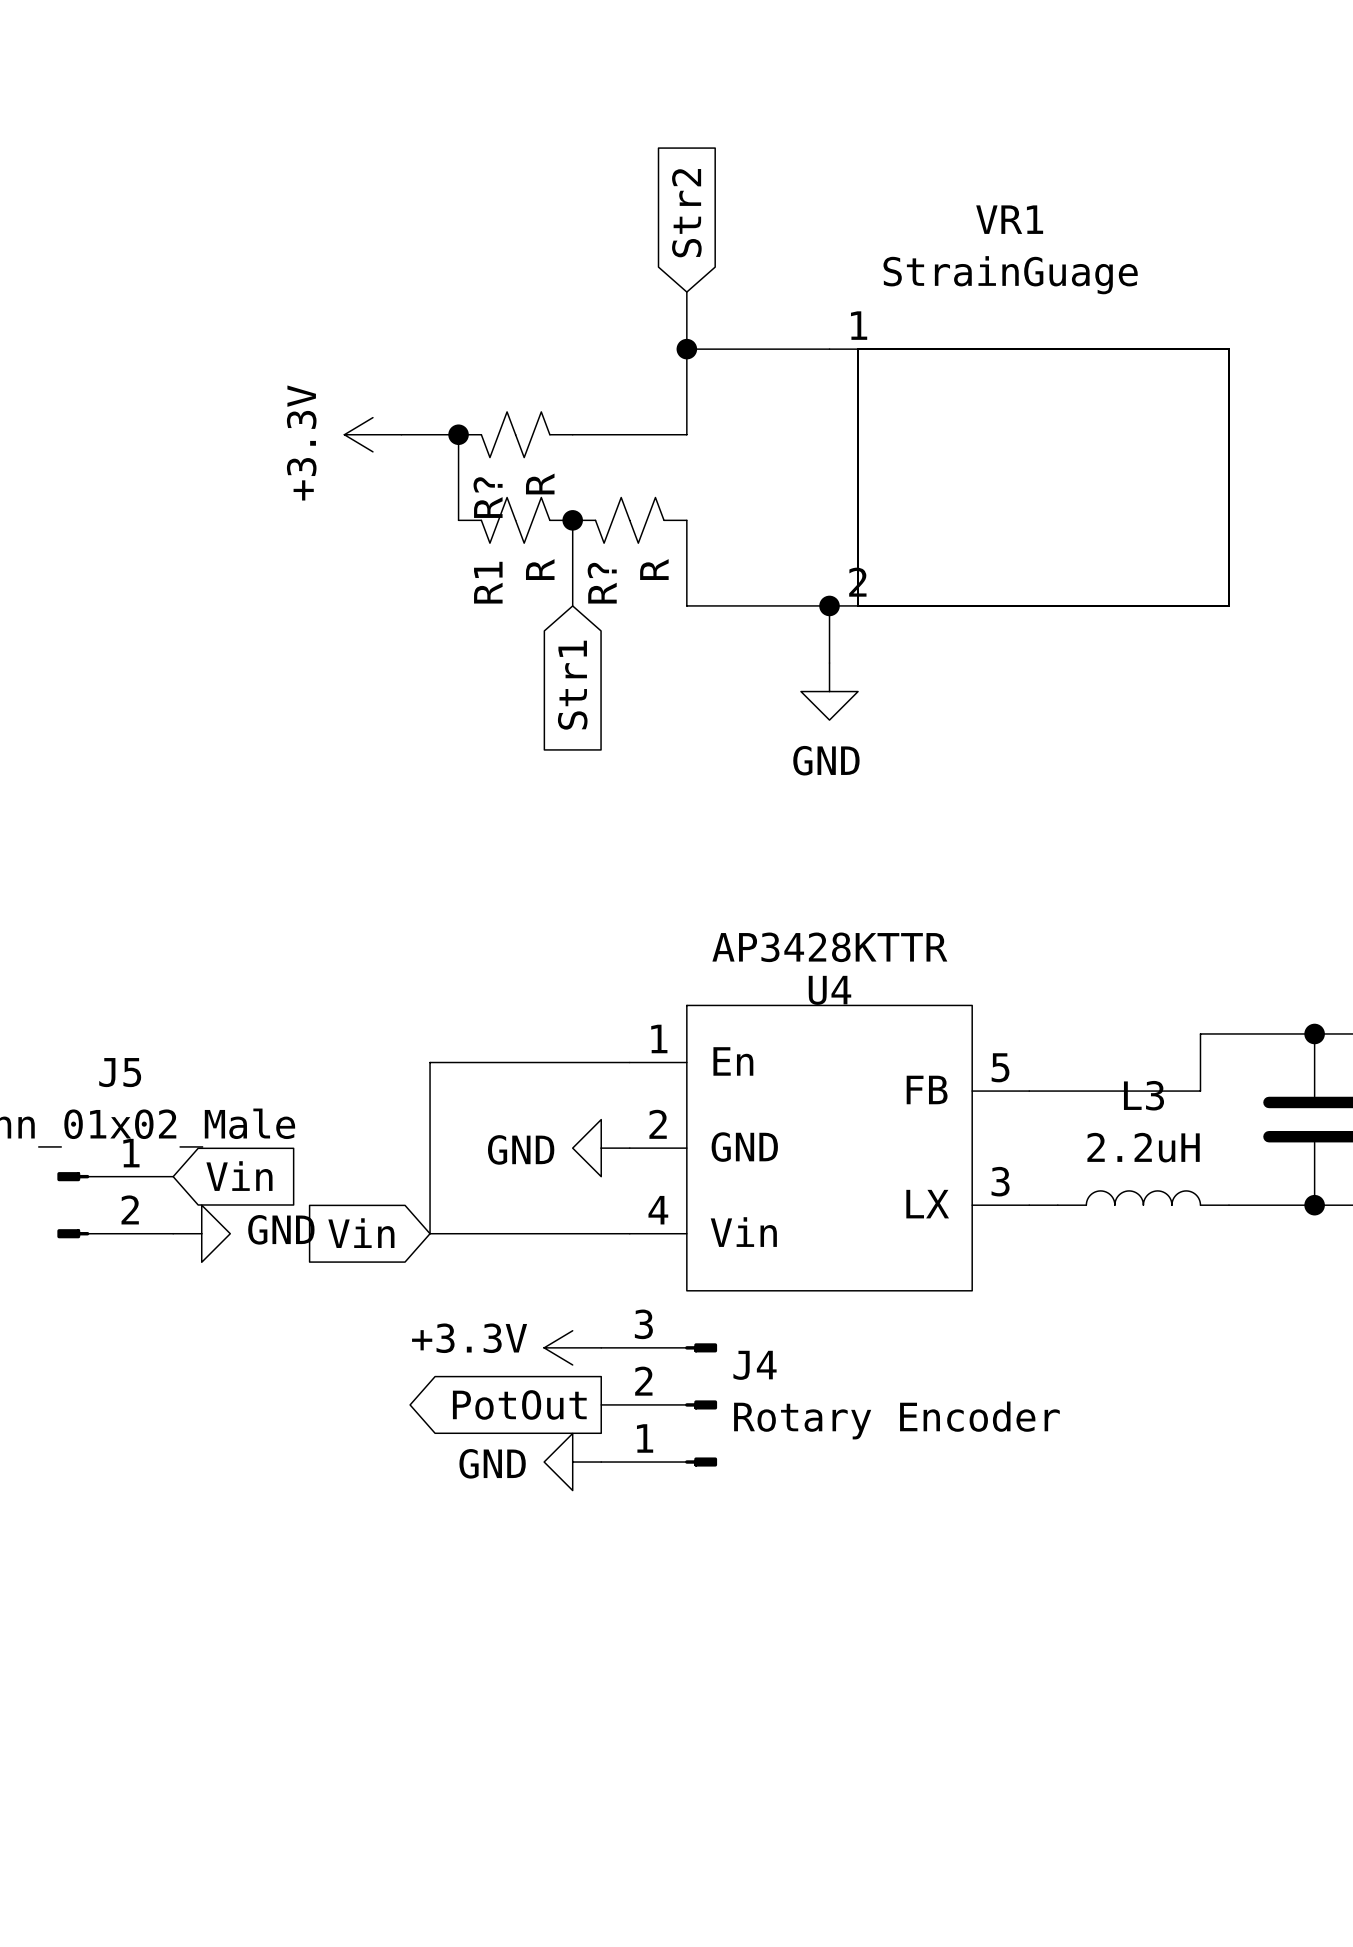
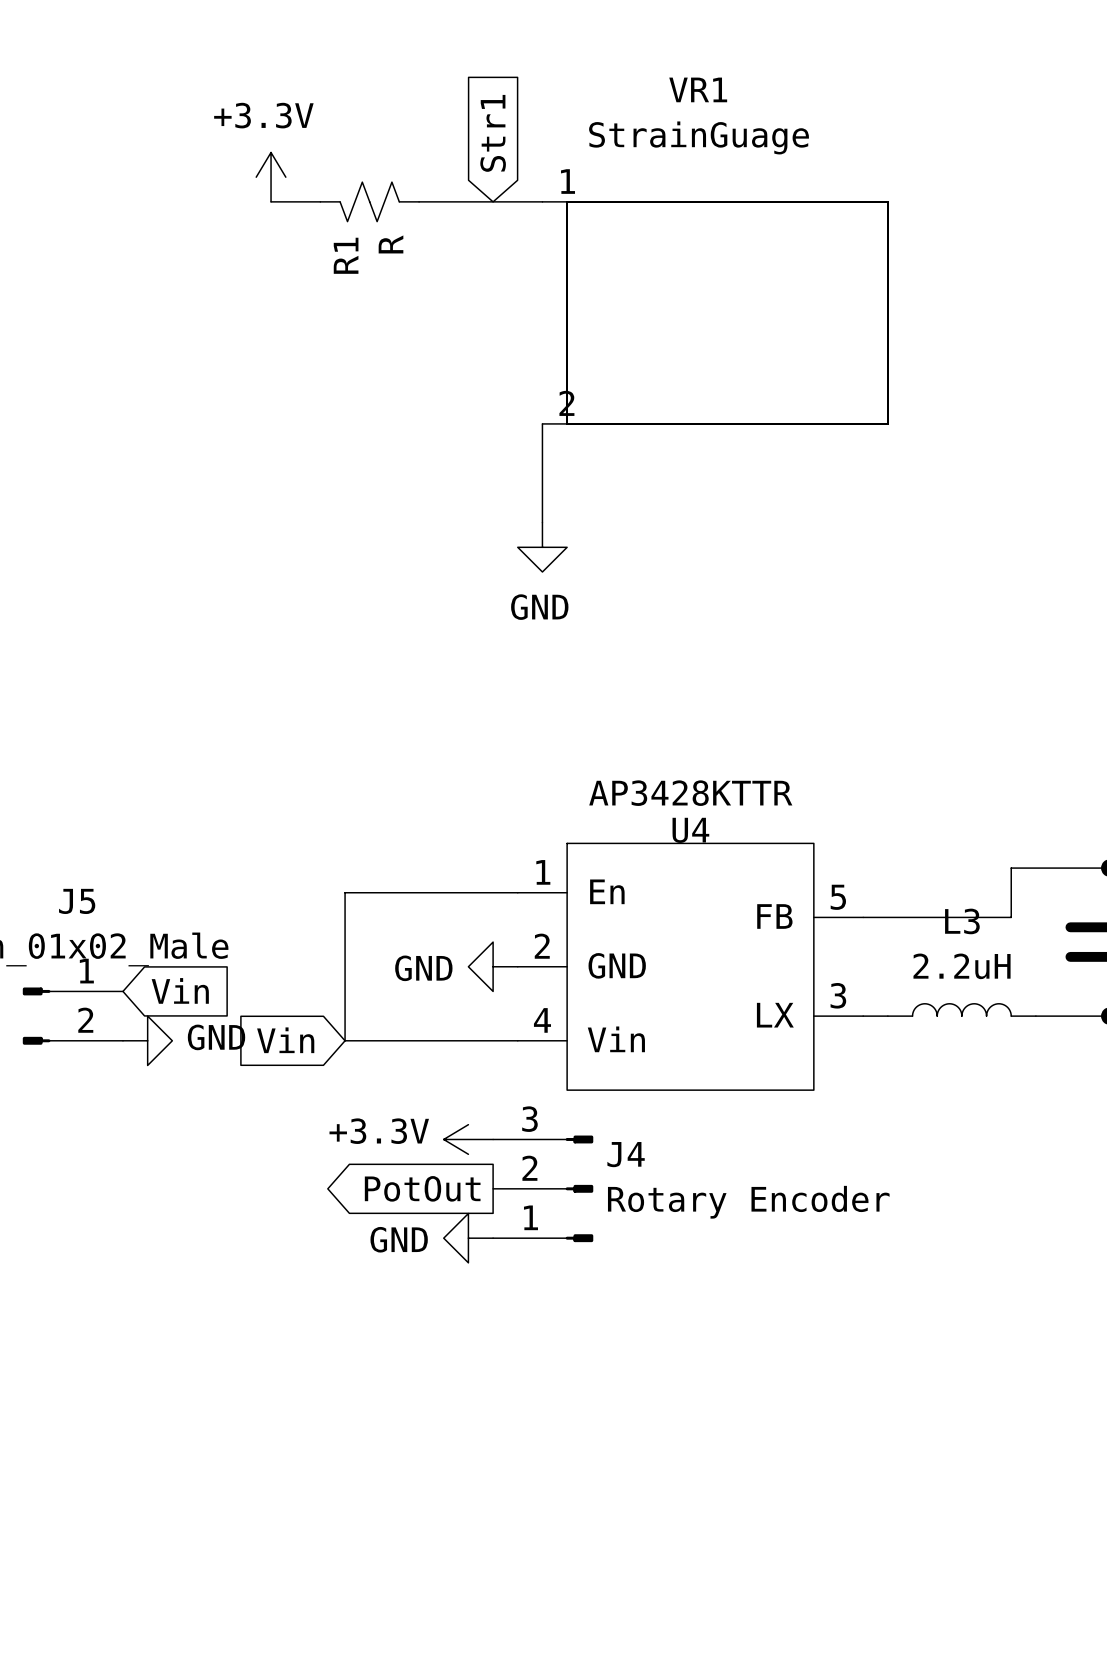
global label: Str2 (686, 213) -> none
wire: none -> (271, 201) (320, 201)
wire: (686, 292) (686, 434) (572, 434) -> none
wire: (686, 349) (829, 349) -> (419, 201) (542, 201)
junction: (686, 349) -> none
power symbol rotation: 0° (372, 434) -> 90° clockwise (271, 177)
power symbol position: +3.3V (372, 434) -> +3.3V (271, 177)
wire: (401, 434) (458, 434) (458, 520) -> none
junction: (458, 434) -> none
R?: R (515, 434) -> none
VR1 position: (1029, 477) -> (715, 312)
R1 position: (515, 520) -> (369, 201)
wire: (572, 520) (572, 605) -> none
junction: (572, 520) -> none
R?: R (629, 520) -> none
wire: none -> (542, 423) (542, 522)
wire: (686, 520) (686, 605) (829, 605) (829, 663) -> none
junction: (829, 605) -> none
global label rotation: 0° (572, 685) -> 180° (493, 133)
global label position: Str1 (572, 685) -> Str1 (493, 133)
power symbol position: GND (829, 691) -> GND (542, 547)

